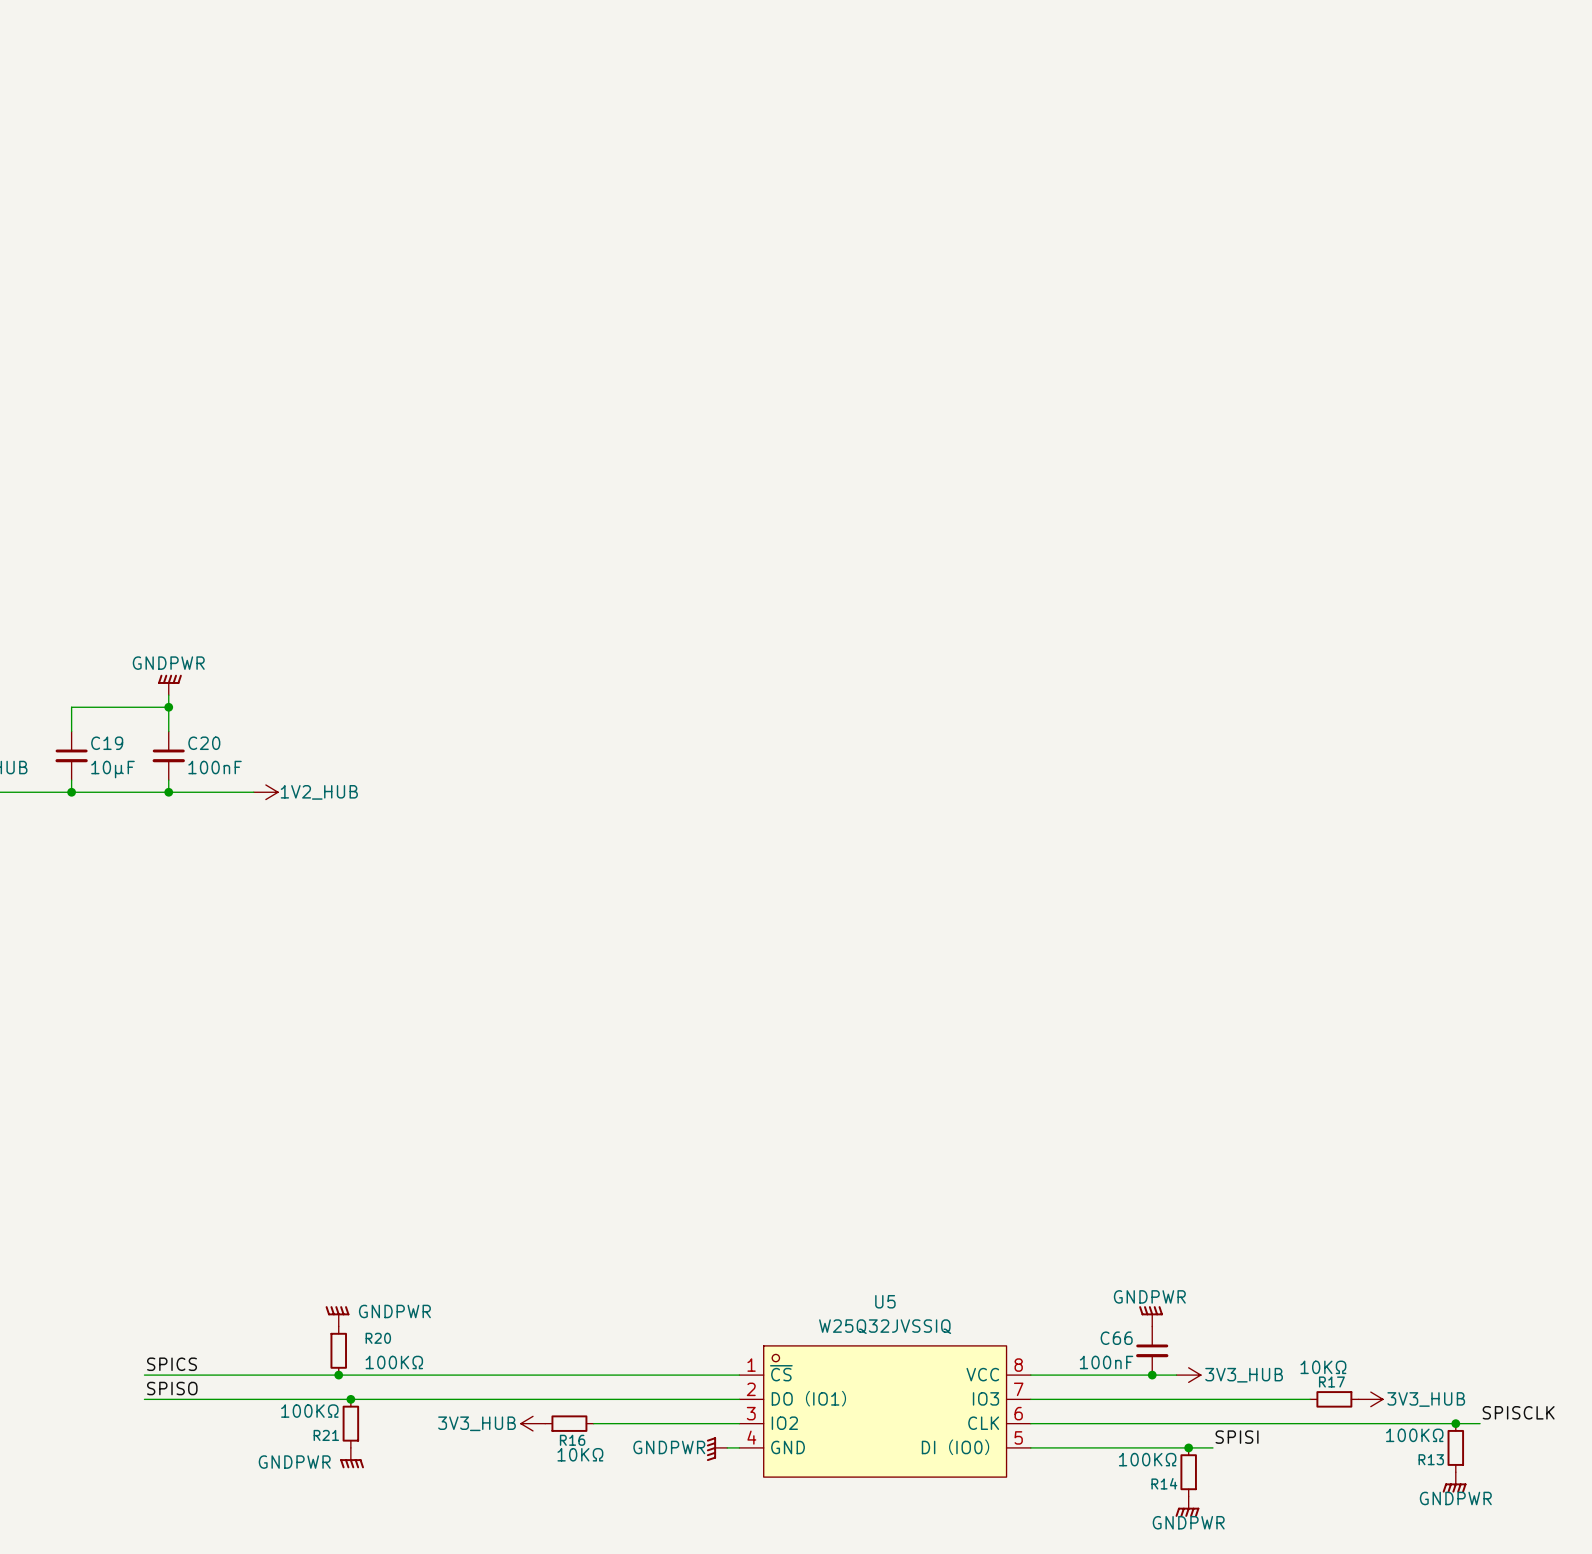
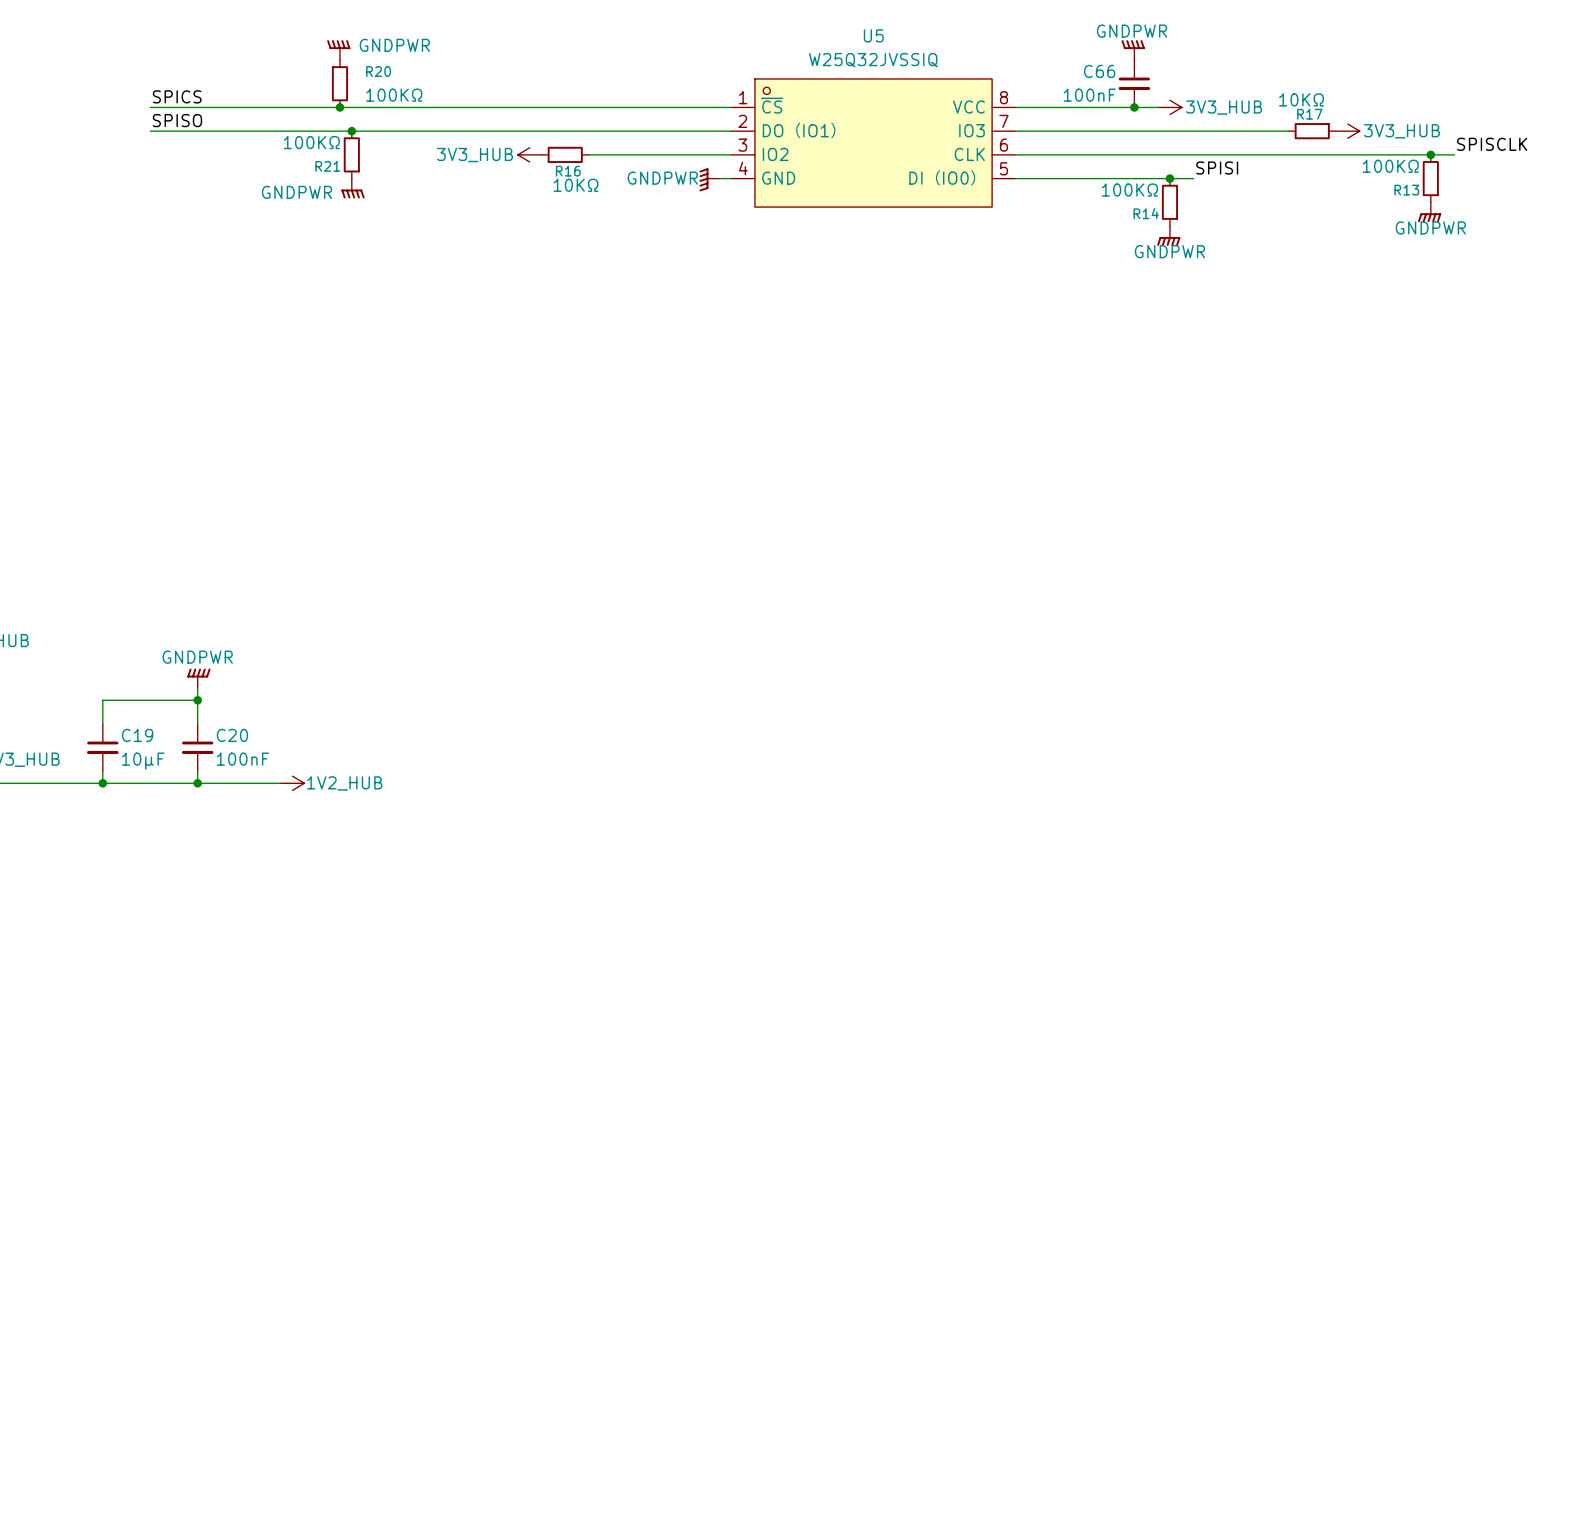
power symbol: none -> GNDPWR (338, 50)
power symbol: none -> GNDPWR (1133, 50)
label: none -> SPICS (177, 96)
wire: none -> (150, 107) (731, 107)
junction: none -> (339, 107)
wire: none -> (1015, 107) (1158, 107)
junction: none -> (1134, 107)
power symbol: none -> 3V3_HUB (1169, 107)
label: none -> SPISO (177, 120)
wire: none -> (150, 131) (731, 131)
junction: none -> (351, 131)
wire: none -> (1015, 131) (1288, 131)
power symbol: none -> 3V3_HUB (1347, 131)
label: none -> SPISCLK (1492, 144)
power symbol: none -> 3V3_HUB (529, 154)
wire: none -> (588, 154) (731, 154)
wire: none -> (1015, 154) (1454, 154)
junction: none -> (1430, 154)
label: none -> SPISI (1217, 168)
wire: none -> (719, 178) (731, 178)
wire: none -> (1015, 178) (1193, 178)
junction: none -> (1169, 178)
power symbol: none -> GNDPWR (709, 179)
power symbol: none -> GNDPWR (353, 188)
power symbol: none -> GNDPWR (1429, 212)
power symbol: none -> GNDPWR (1168, 235)
power symbol: GNDPWR (337, 1316) -> none
power symbol: GNDPWR (1151, 1316) -> none
R20 position: (338, 1350) -> (339, 83)
C66 position: (1152, 1350) -> (1134, 83)
label: SPICS (172, 1364) -> none
wire: (144, 1375) (739, 1375) -> none
junction: (338, 1375) -> none
wire: (1030, 1375) (1176, 1375) -> none
junction: (1152, 1375) -> none
power symbol: 3V3_HUB (1188, 1375) -> none
label: SPISO (172, 1388) -> none
wire: (144, 1399) (739, 1399) -> none
junction: (350, 1399) -> none
wire: (1030, 1399) (1310, 1399) -> none
R17 position: (1334, 1399) -> (1312, 131)
power symbol: 3V3_HUB (1370, 1399) -> none
U5 position: (885, 1411) -> (873, 143)
label: SPISCLK (1518, 1412) -> none
R21 position: (350, 1423) -> (351, 154)
power symbol: 3V3_HUB (533, 1423) -> none
R16 position: (569, 1423) -> (565, 154)
wire: (593, 1423) (739, 1423) -> none
wire: (1030, 1423) (1480, 1423) -> none
junction: (1455, 1423) -> none
label: SPISI (1237, 1437) -> none
wire: (727, 1447) (739, 1447) -> none
wire: (1030, 1447) (1212, 1447) -> none
junction: (1188, 1447) -> none
R13 position: (1455, 1447) -> (1430, 178)
power symbol: GNDPWR (717, 1449) -> none
power symbol: GNDPWR (352, 1458) -> none
R14 position: (1188, 1472) -> (1169, 202)
power symbol: GNDPWR (1454, 1482) -> none
power symbol: GNDPWR (1187, 1506) -> none

